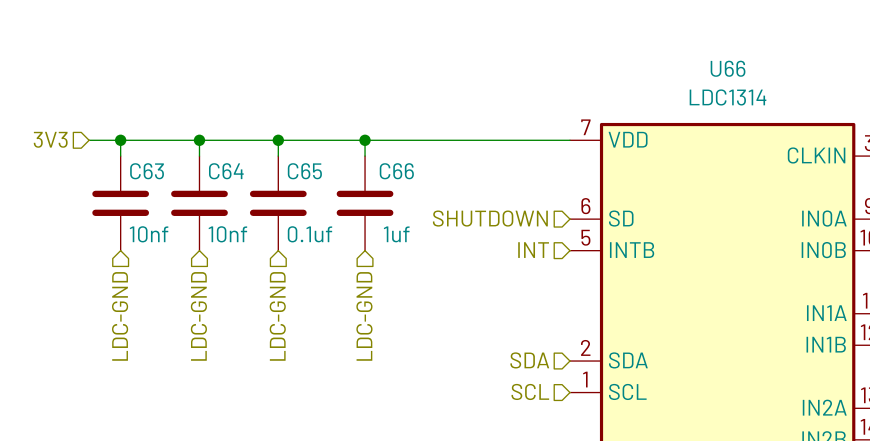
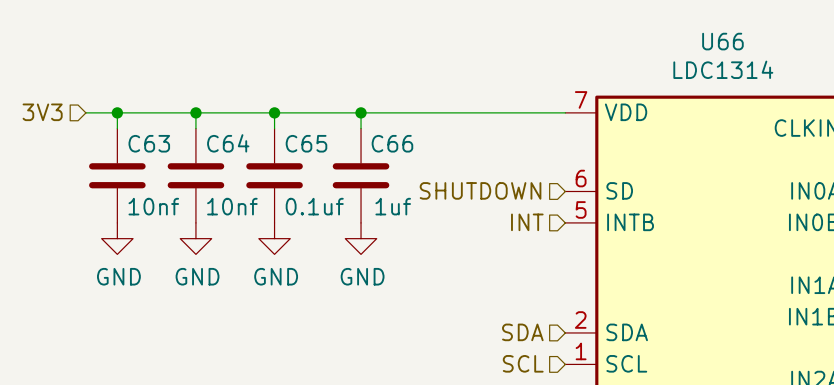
power symbol: none -> GND (117, 238)
power symbol: none -> GND (195, 238)
power symbol: none -> GND (274, 238)
power symbol: none -> GND (361, 238)
hierarchical label: LDC-GND (120, 316) -> none
hierarchical label: LDC-GND (198, 316) -> none
hierarchical label: LDC-GND (277, 316) -> none
hierarchical label: LDC-GND (364, 316) -> none

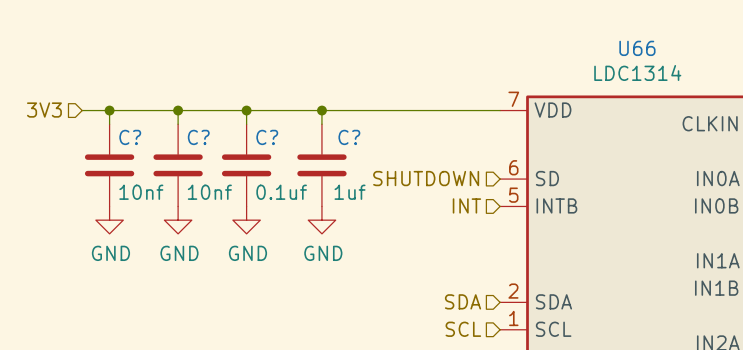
C63 name: C63 (149, 143) -> C? (130, 137)
C64 name: C64 (228, 143) -> C? (198, 137)
C65 name: C65 (306, 143) -> C? (267, 137)
C66 name: C66 (392, 143) -> C? (349, 137)

